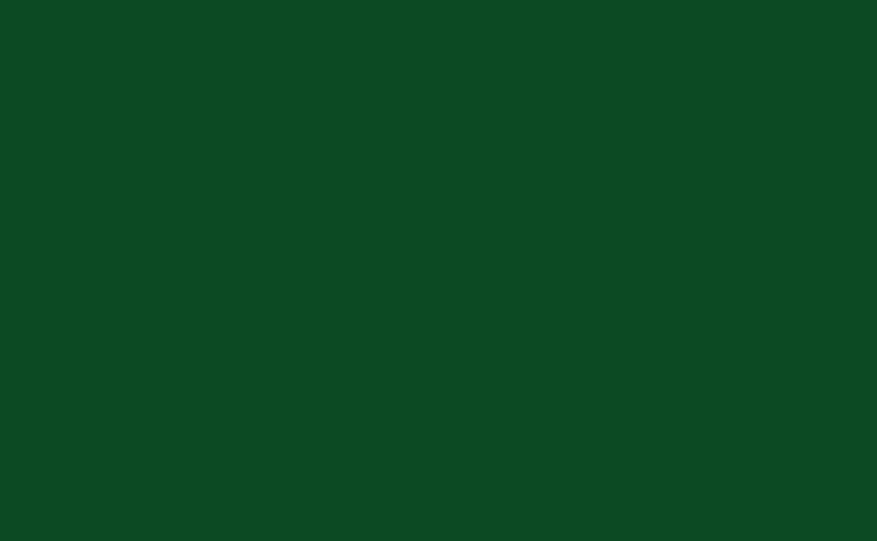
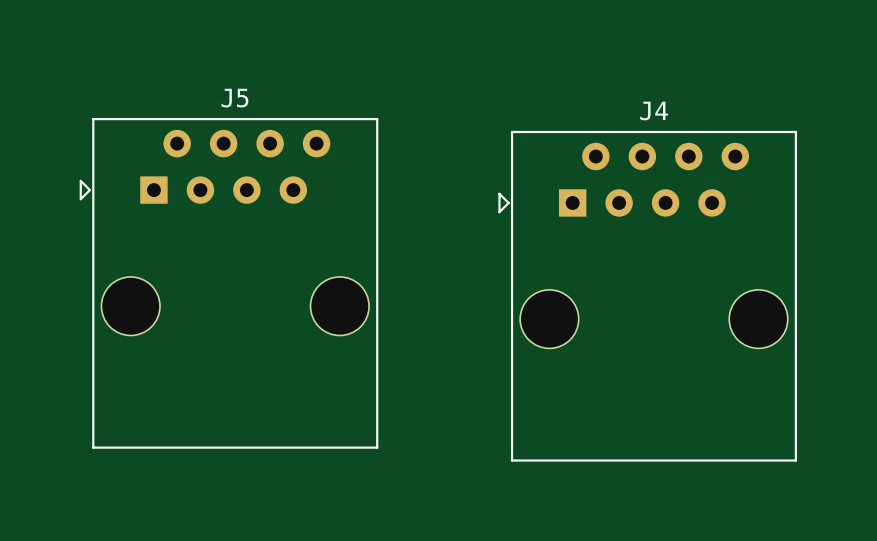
J5: none -> (228, 283)
J4: none -> (647, 296)

